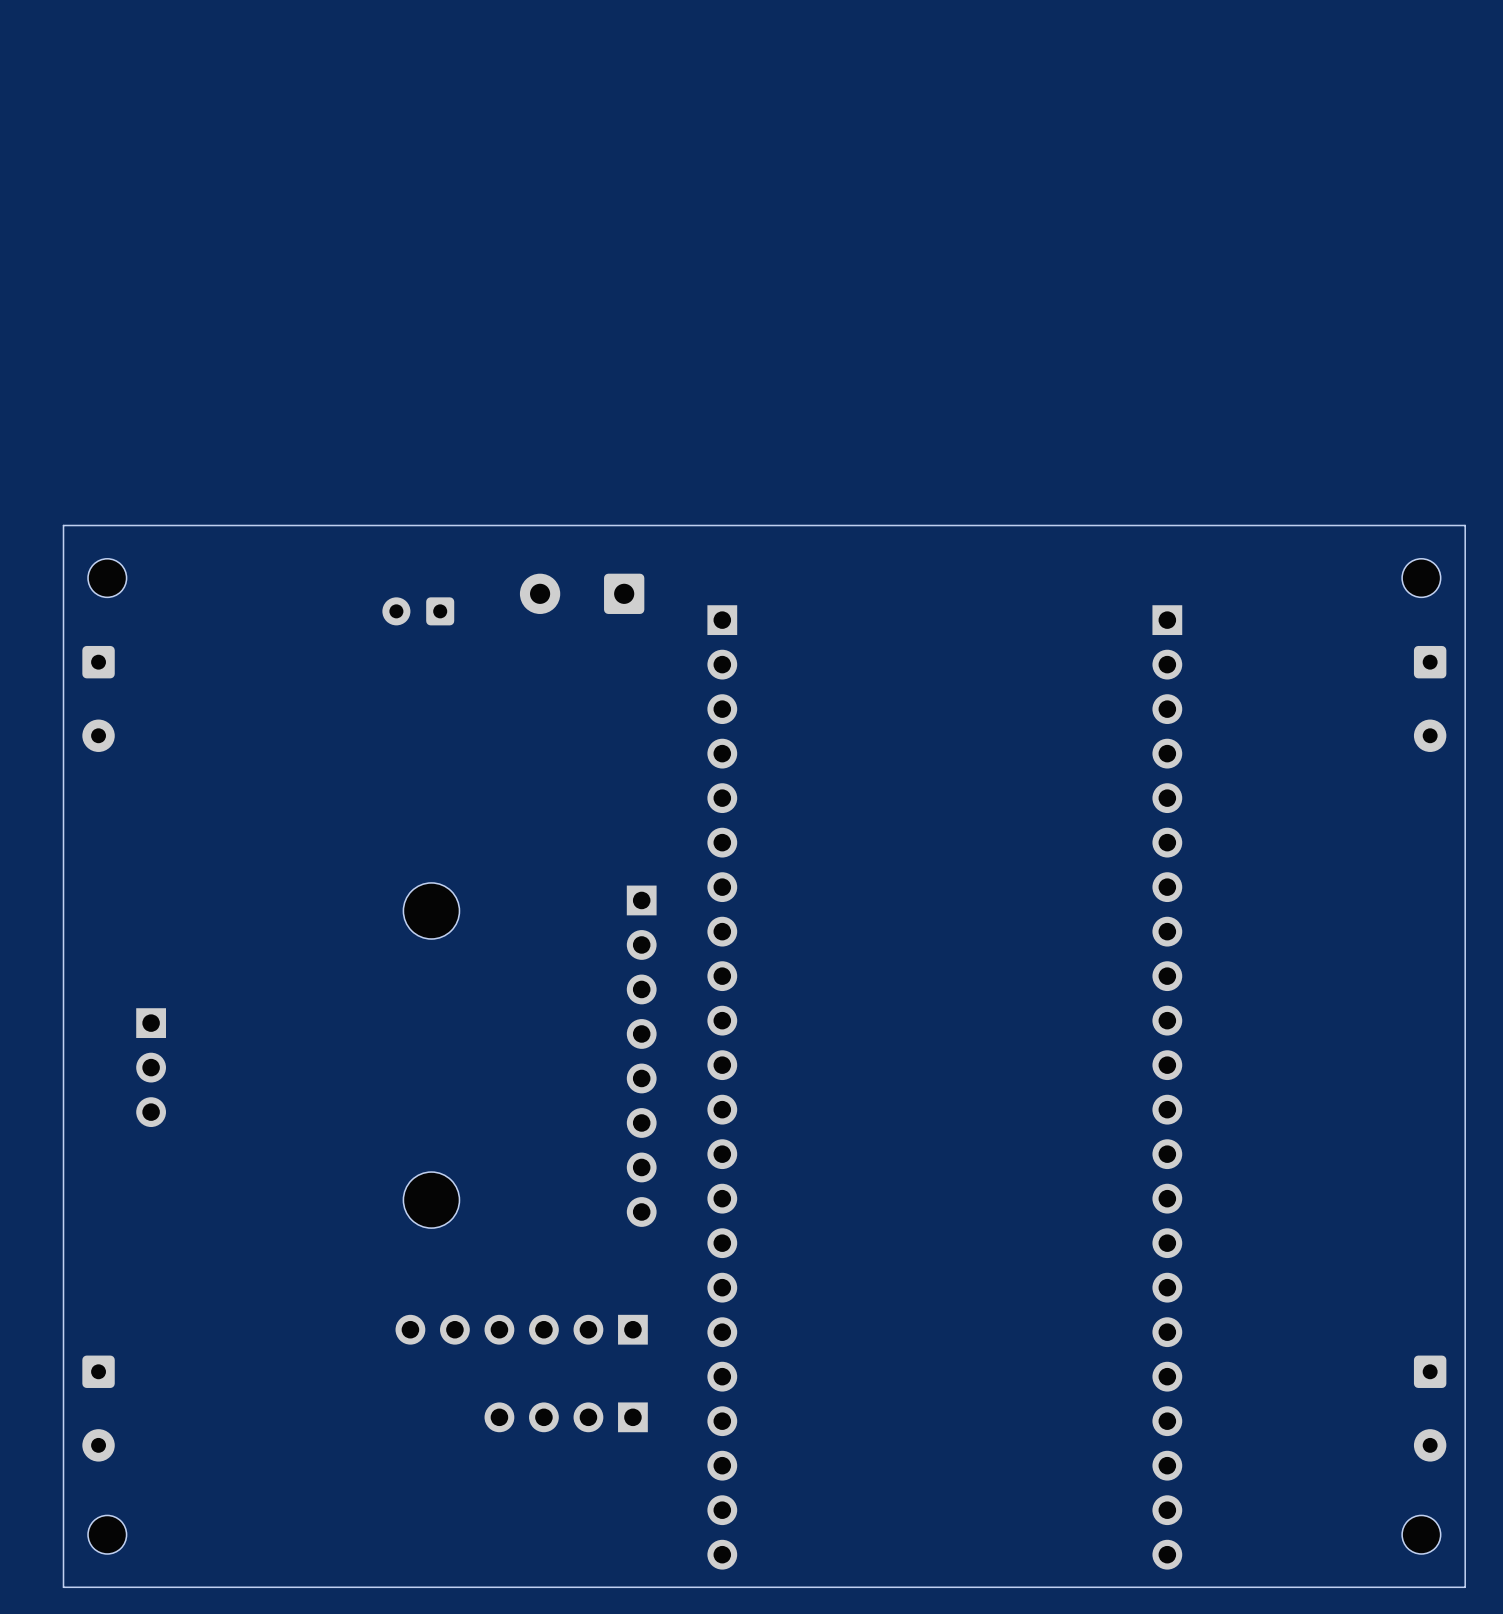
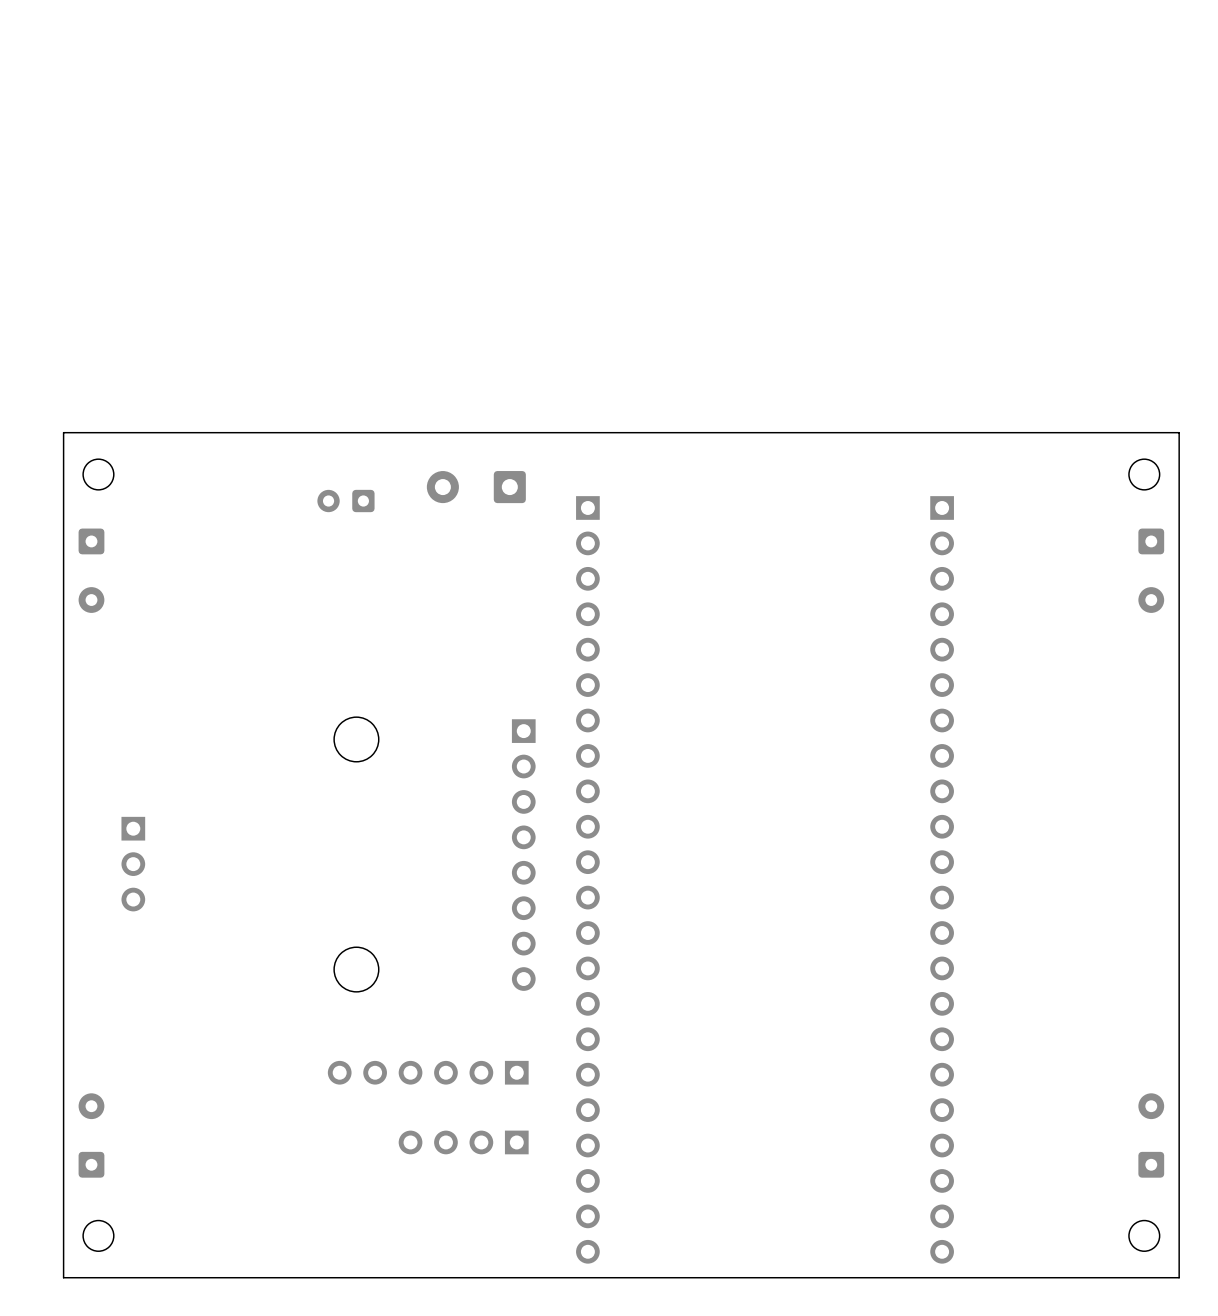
part rotation: 0° (98, 1408) -> 180° (91, 1135)
part rotation: 0° (1430, 1408) -> 180° (1151, 1135)

